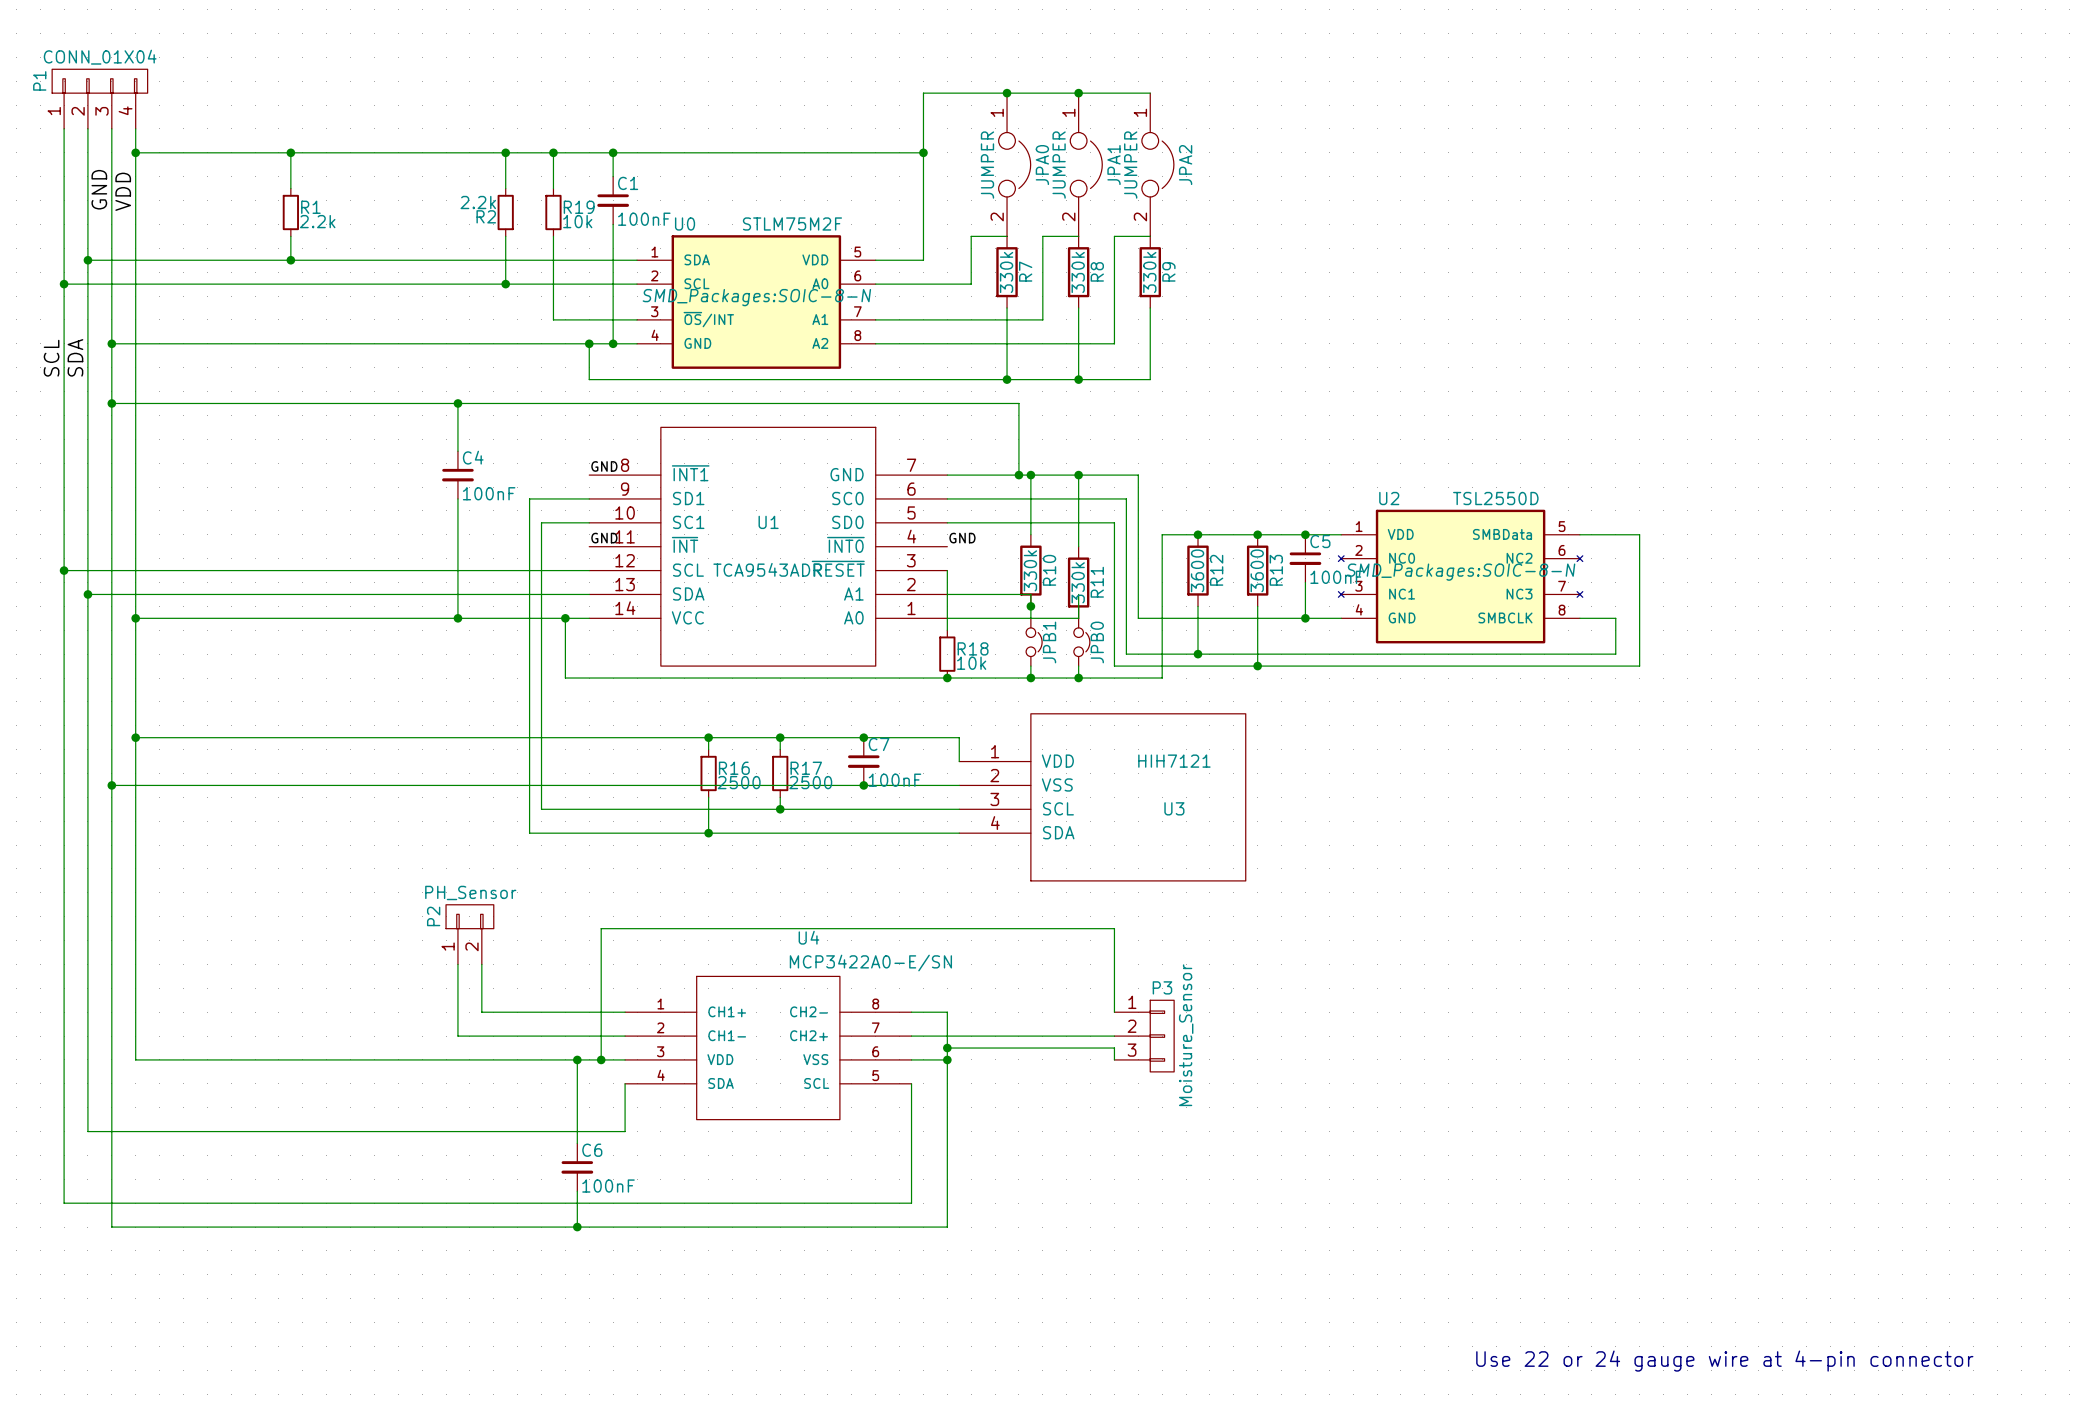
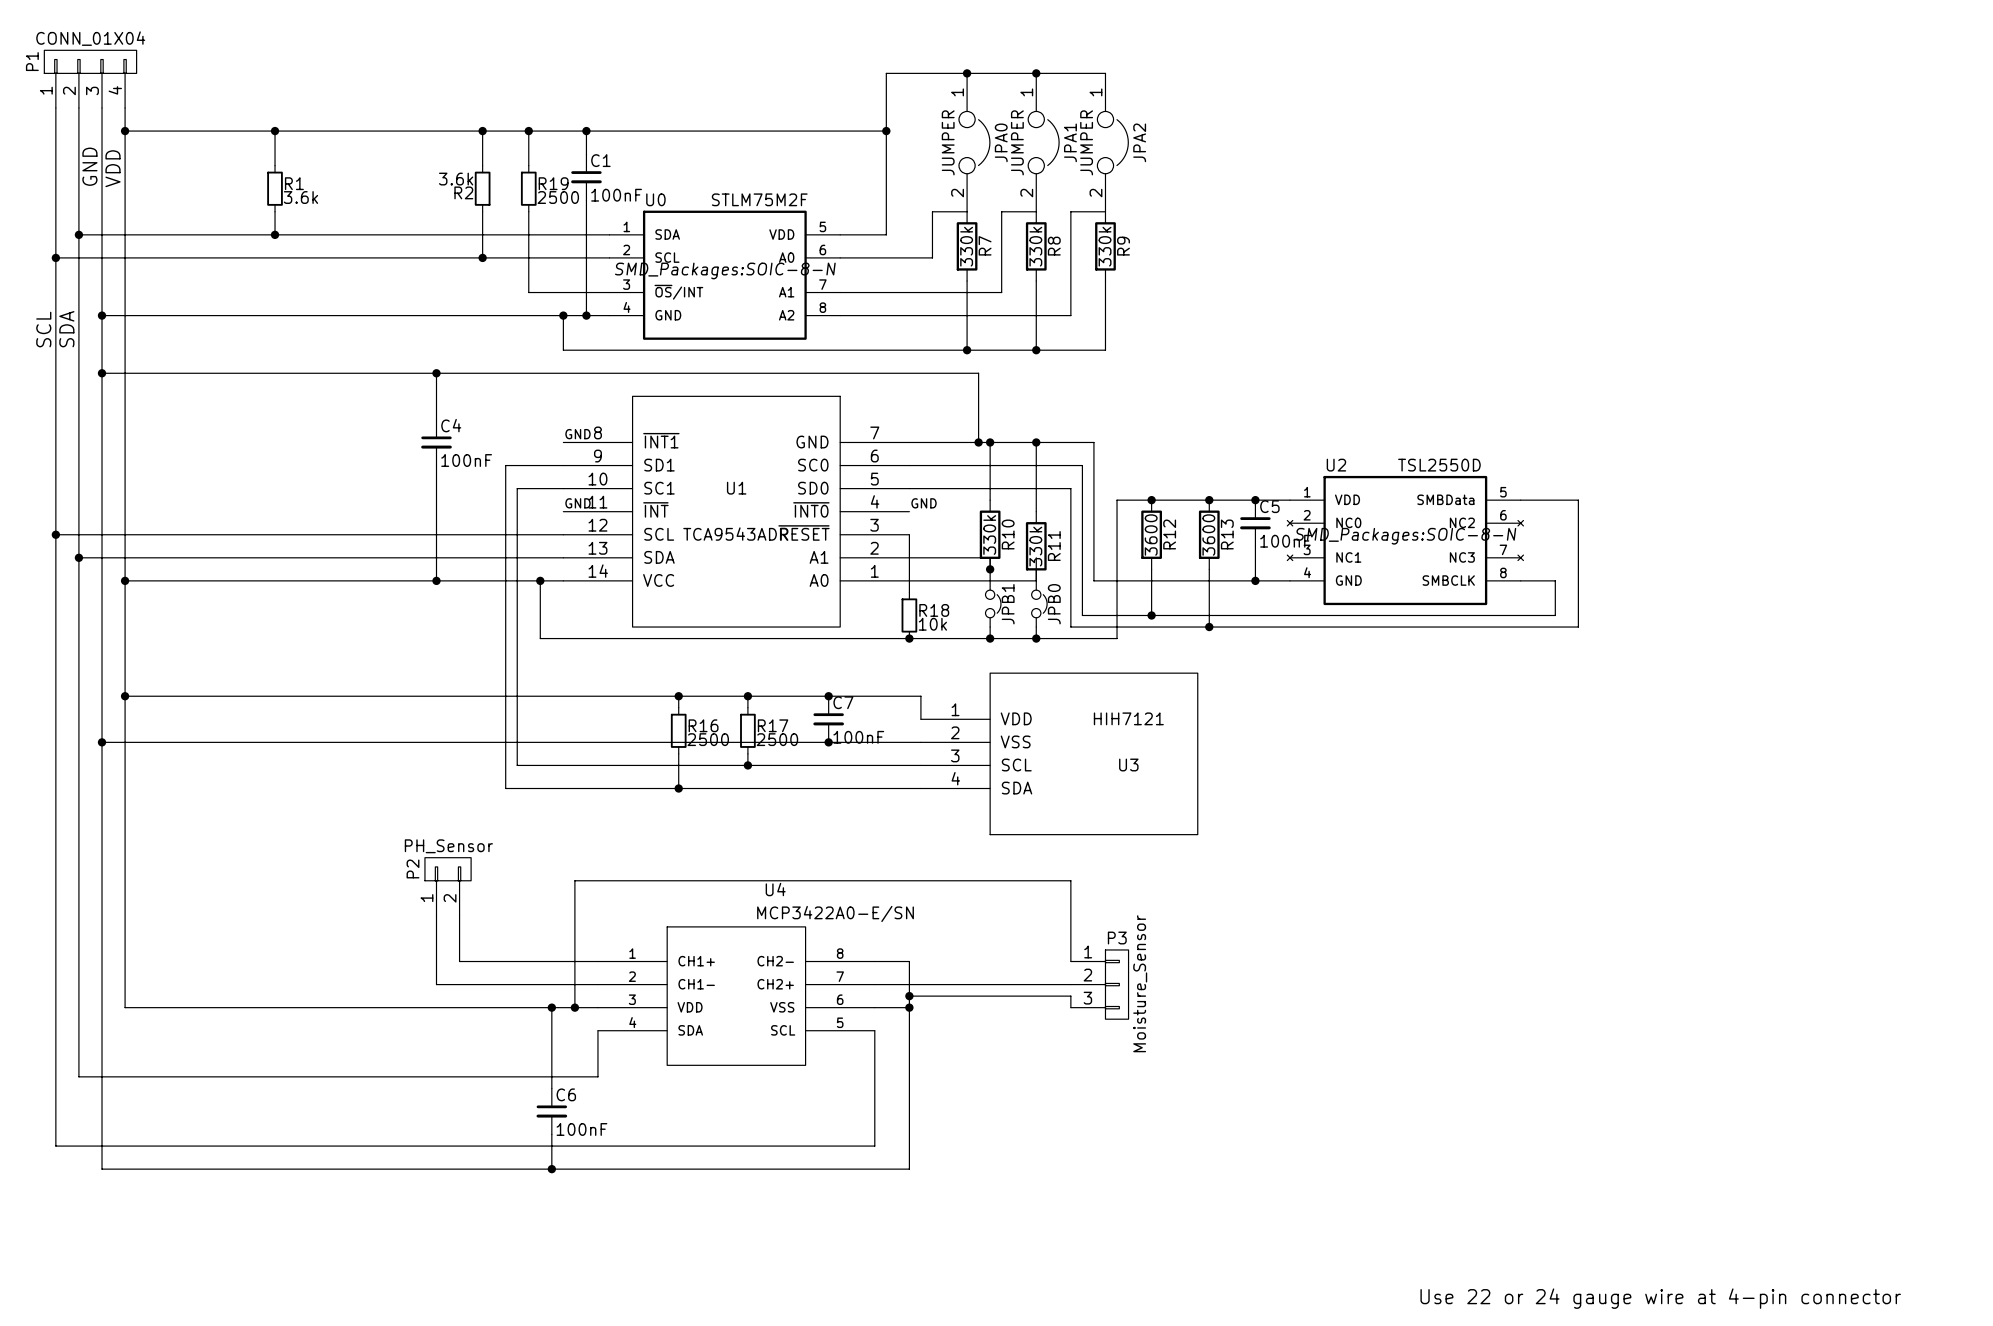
R2 value: 2.2k (478, 202) -> 3.6k (456, 179)
R1 value: 2.2k (317, 221) -> 3.6k (300, 197)
R19 value: 10k (577, 221) -> 2500 (558, 197)

